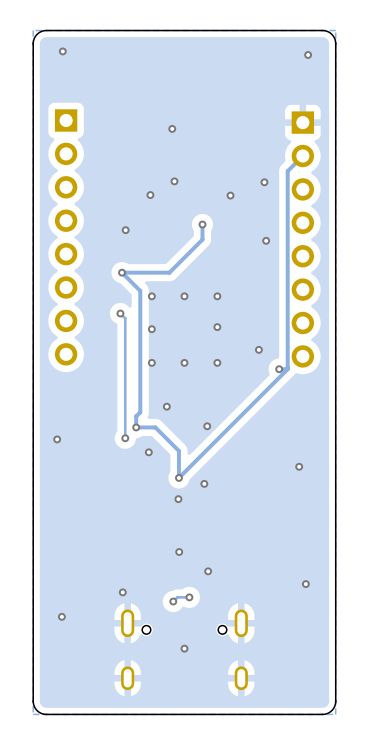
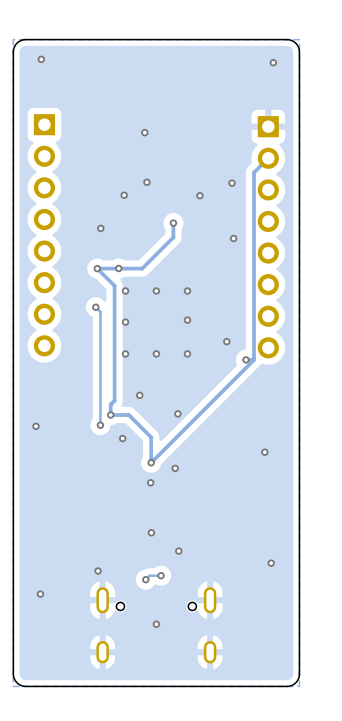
via: none -> (118, 268)

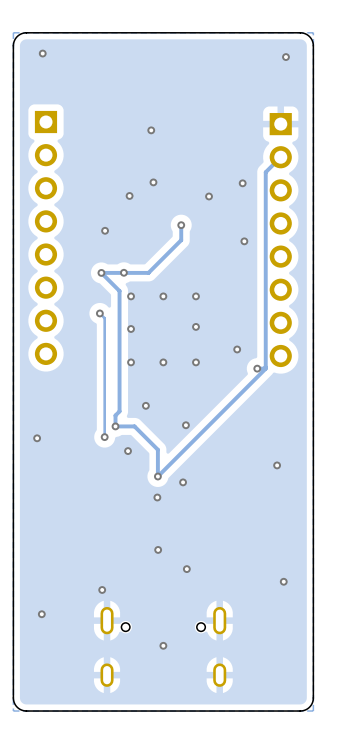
track: (161, 575) (149, 575) (145, 579) -> none
via: (161, 575) -> none
via: (145, 579) -> none

